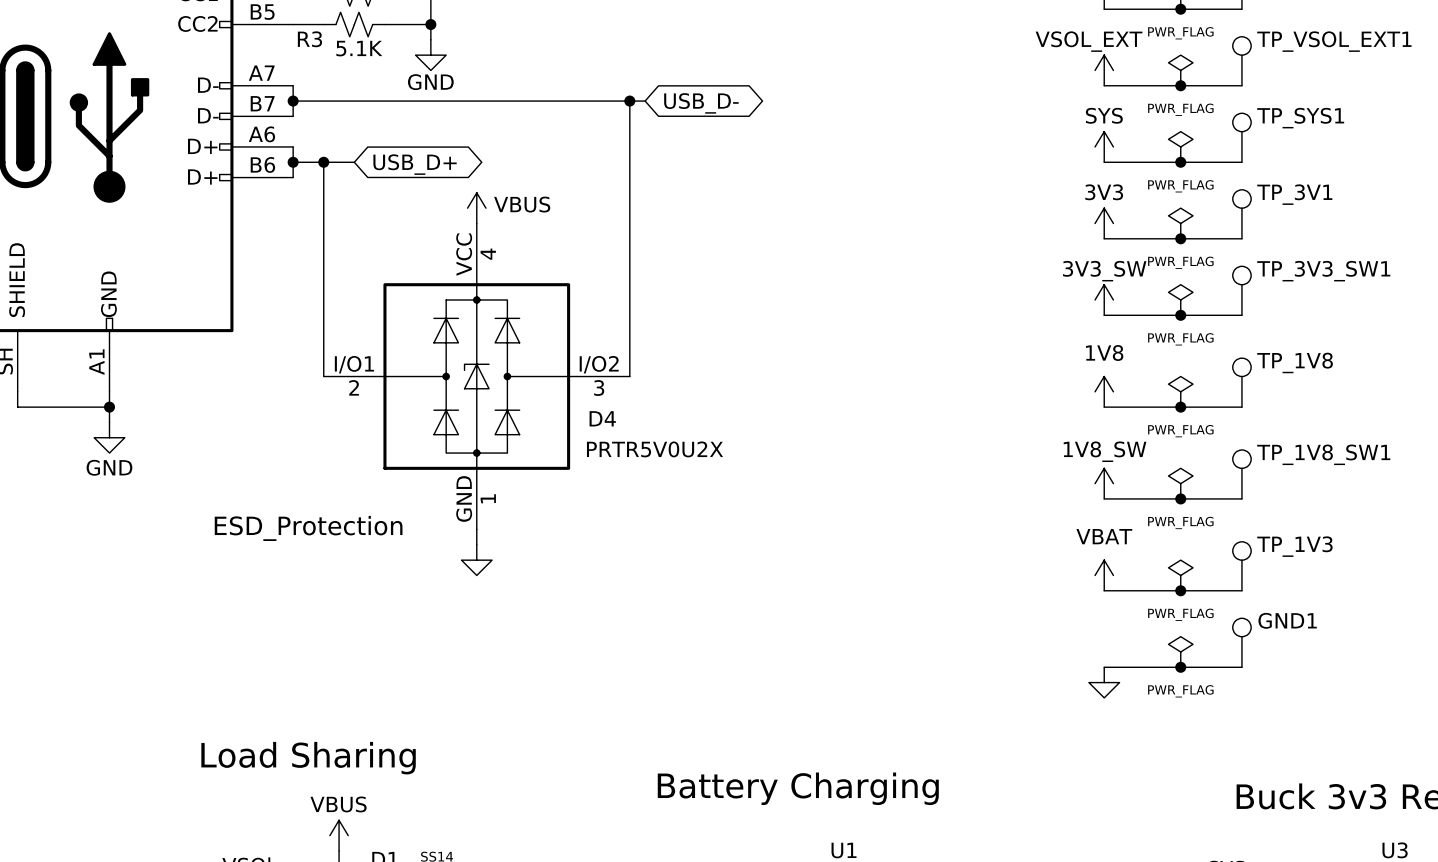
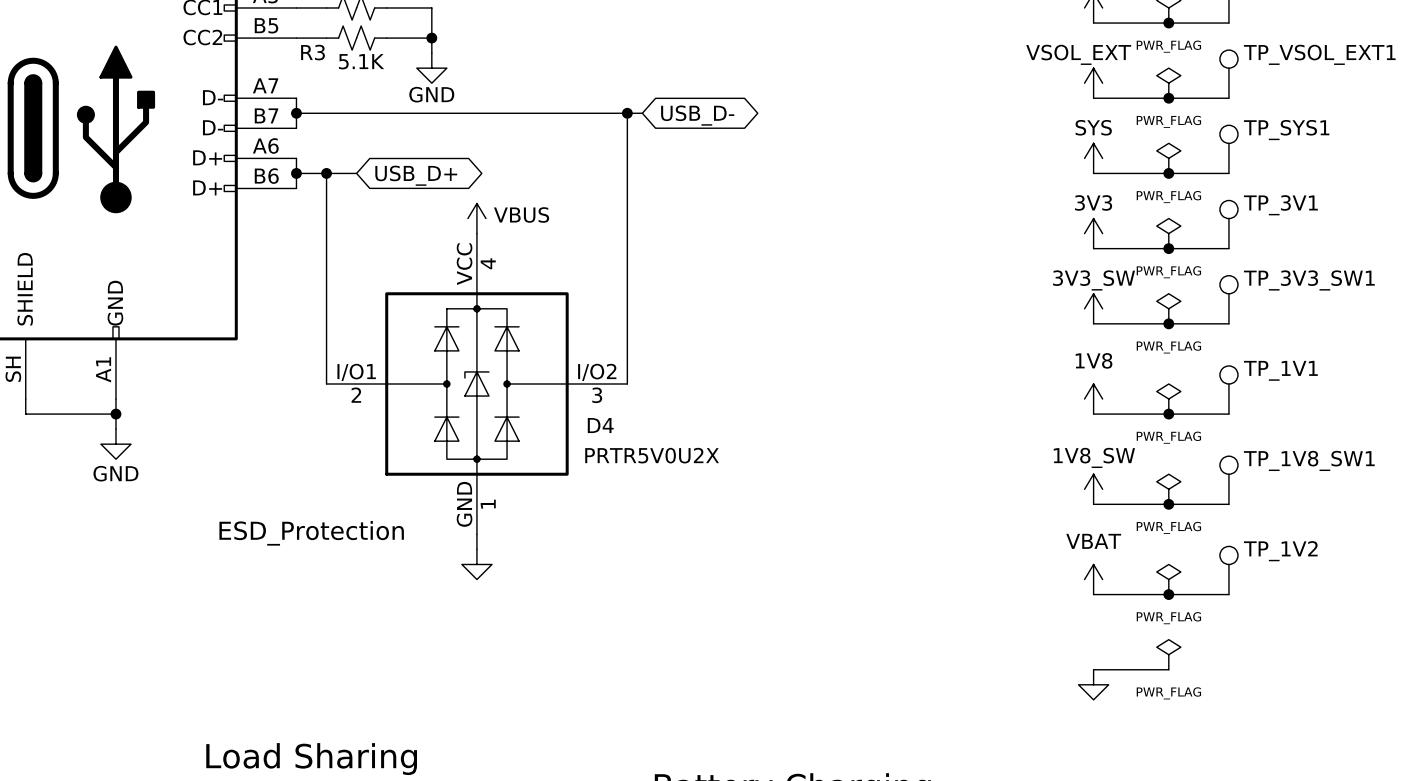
TP_1V8 name: TP_1V8 (1295, 362) -> TP_1V1 (1280, 370)
TP_1V3 name: TP_1V3 (1294, 546) -> TP_1V2 (1280, 551)
GND1: (1241, 642) -> none
wire: (1180, 667) (1241, 667) -> none
junction: (1180, 667) -> none

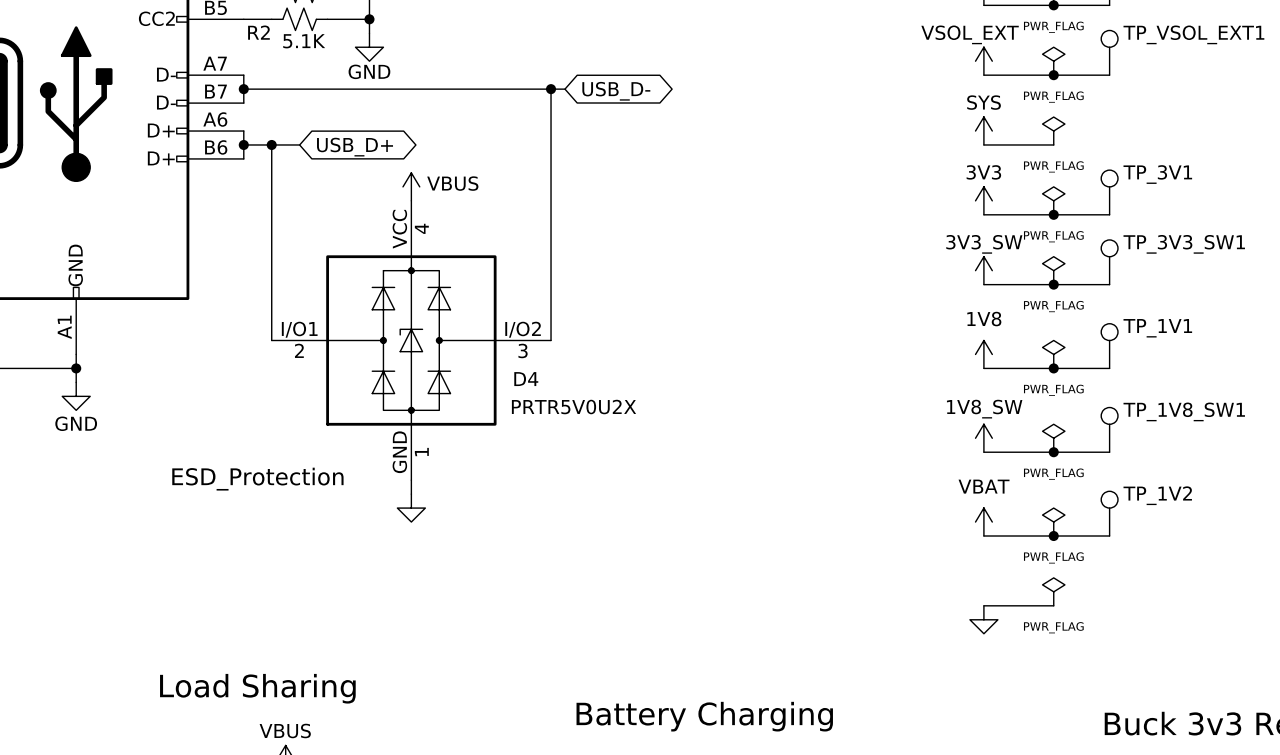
R3 name: R3 (313, 52) -> R2 (258, 32)
TP_SYS1: (1228, 149) -> none
wire: (1168, 173) (1228, 173) -> none
junction: (1168, 173) -> none

